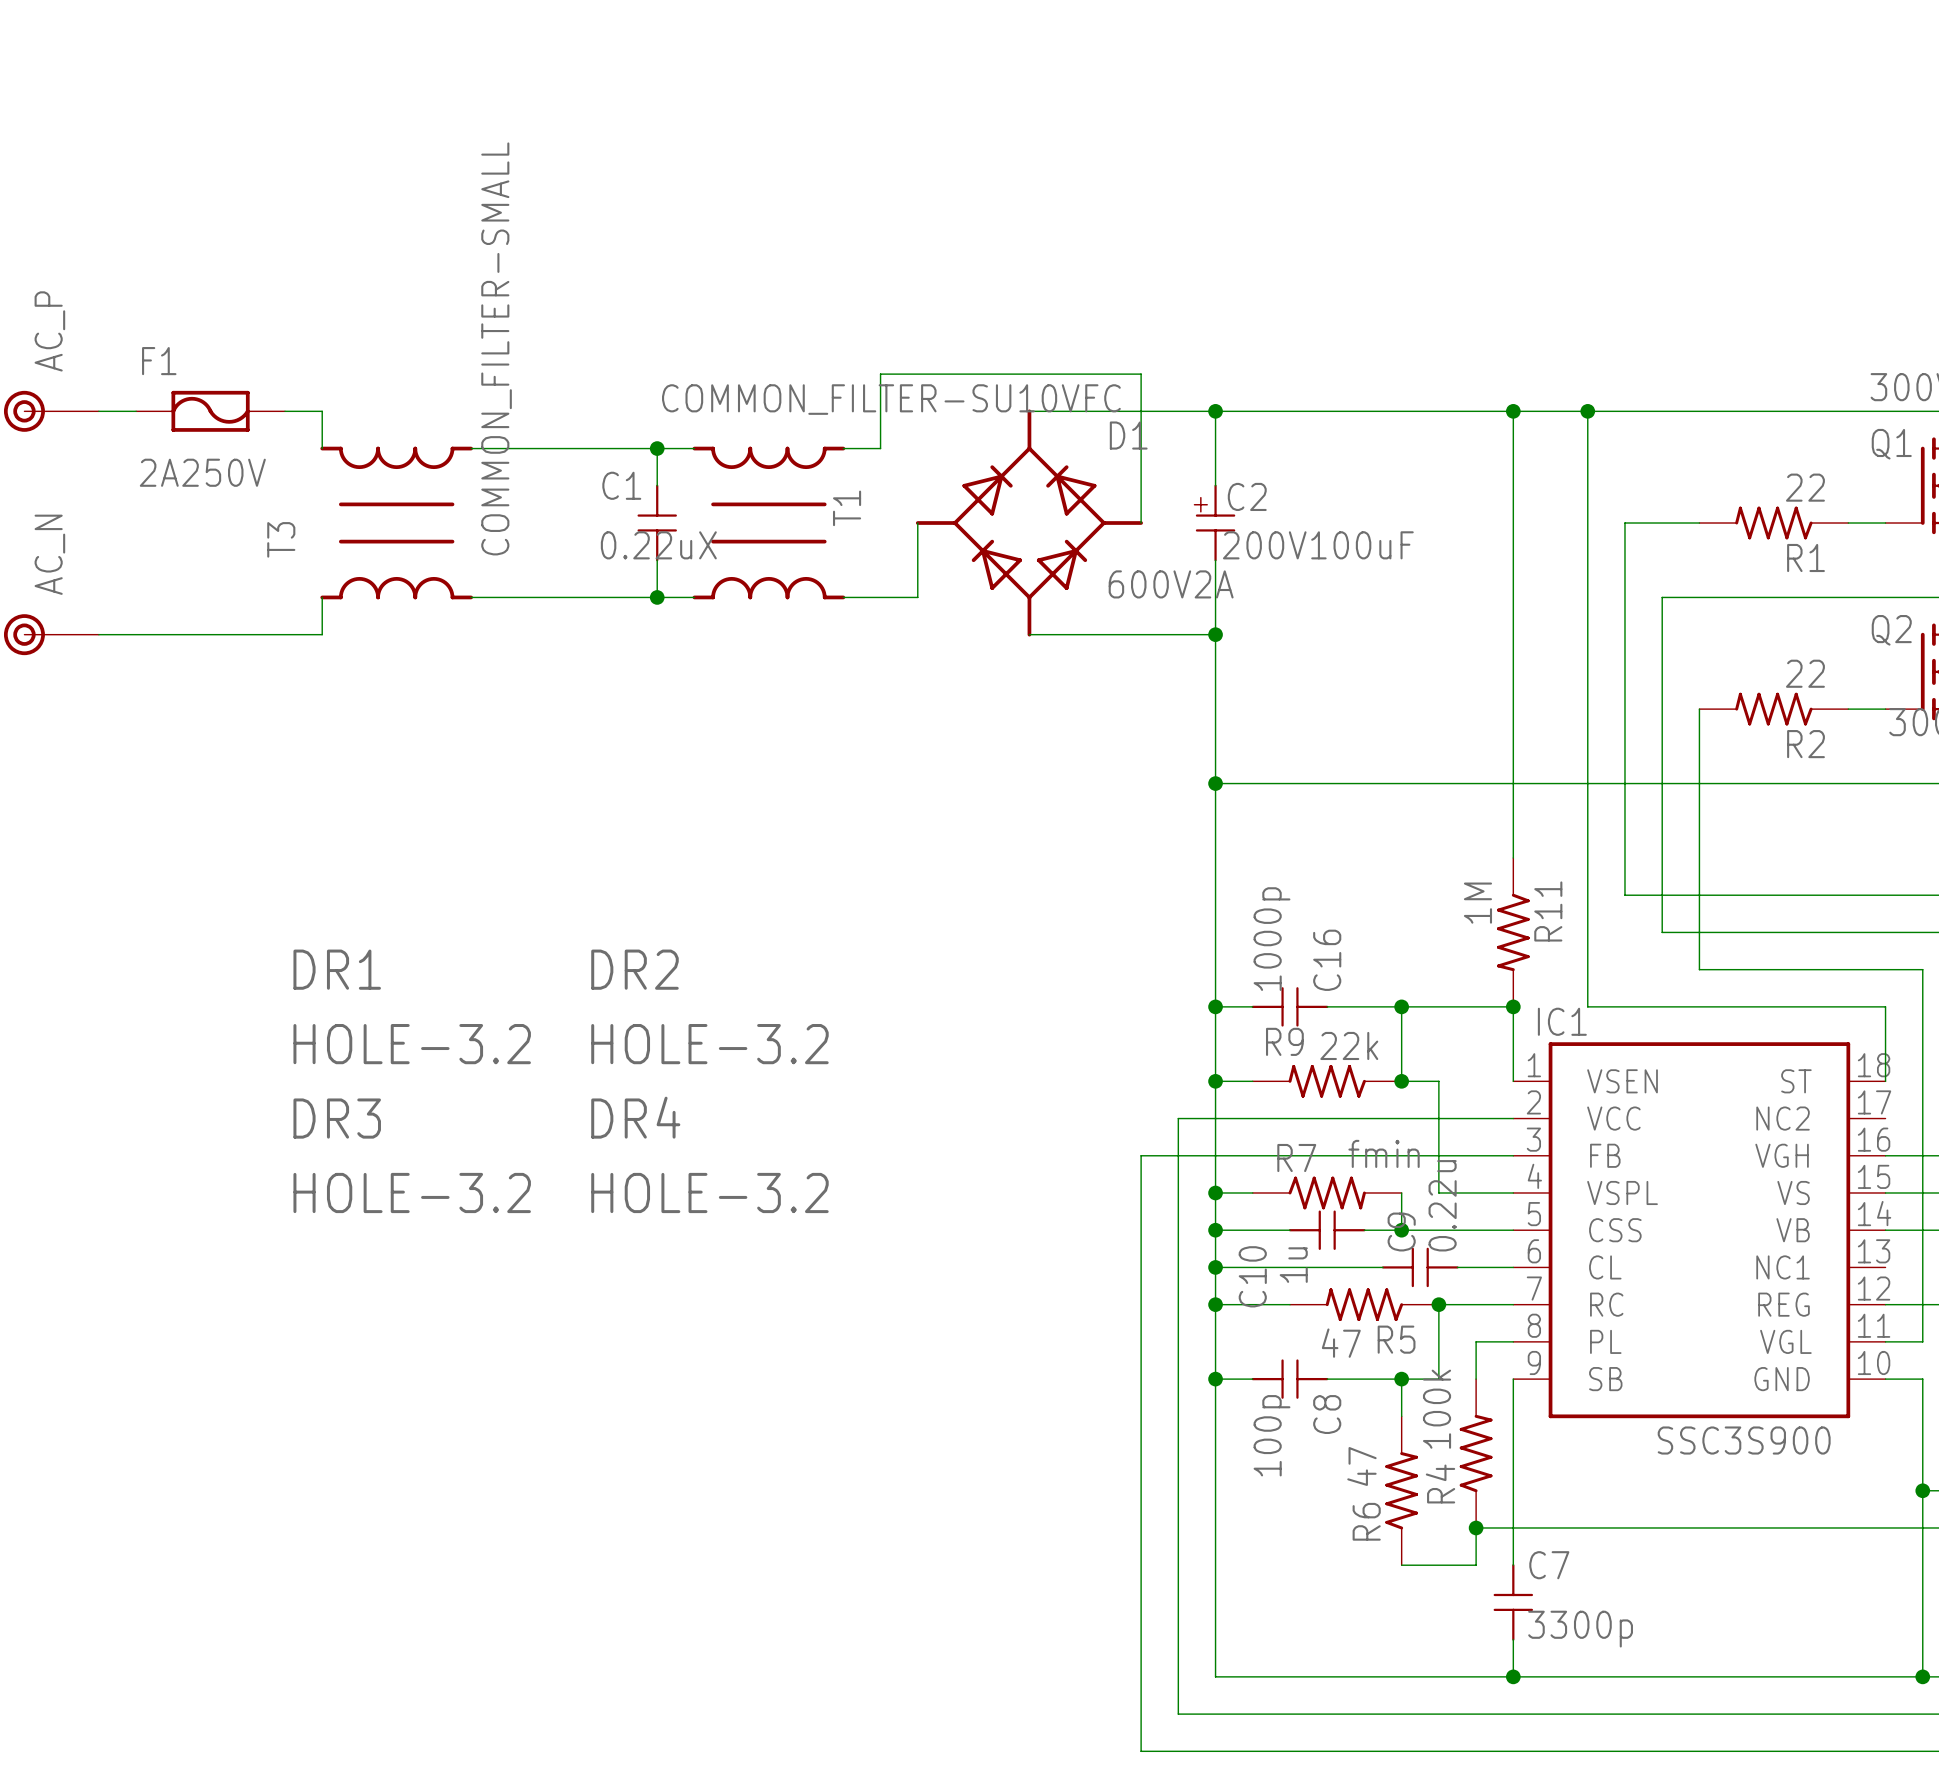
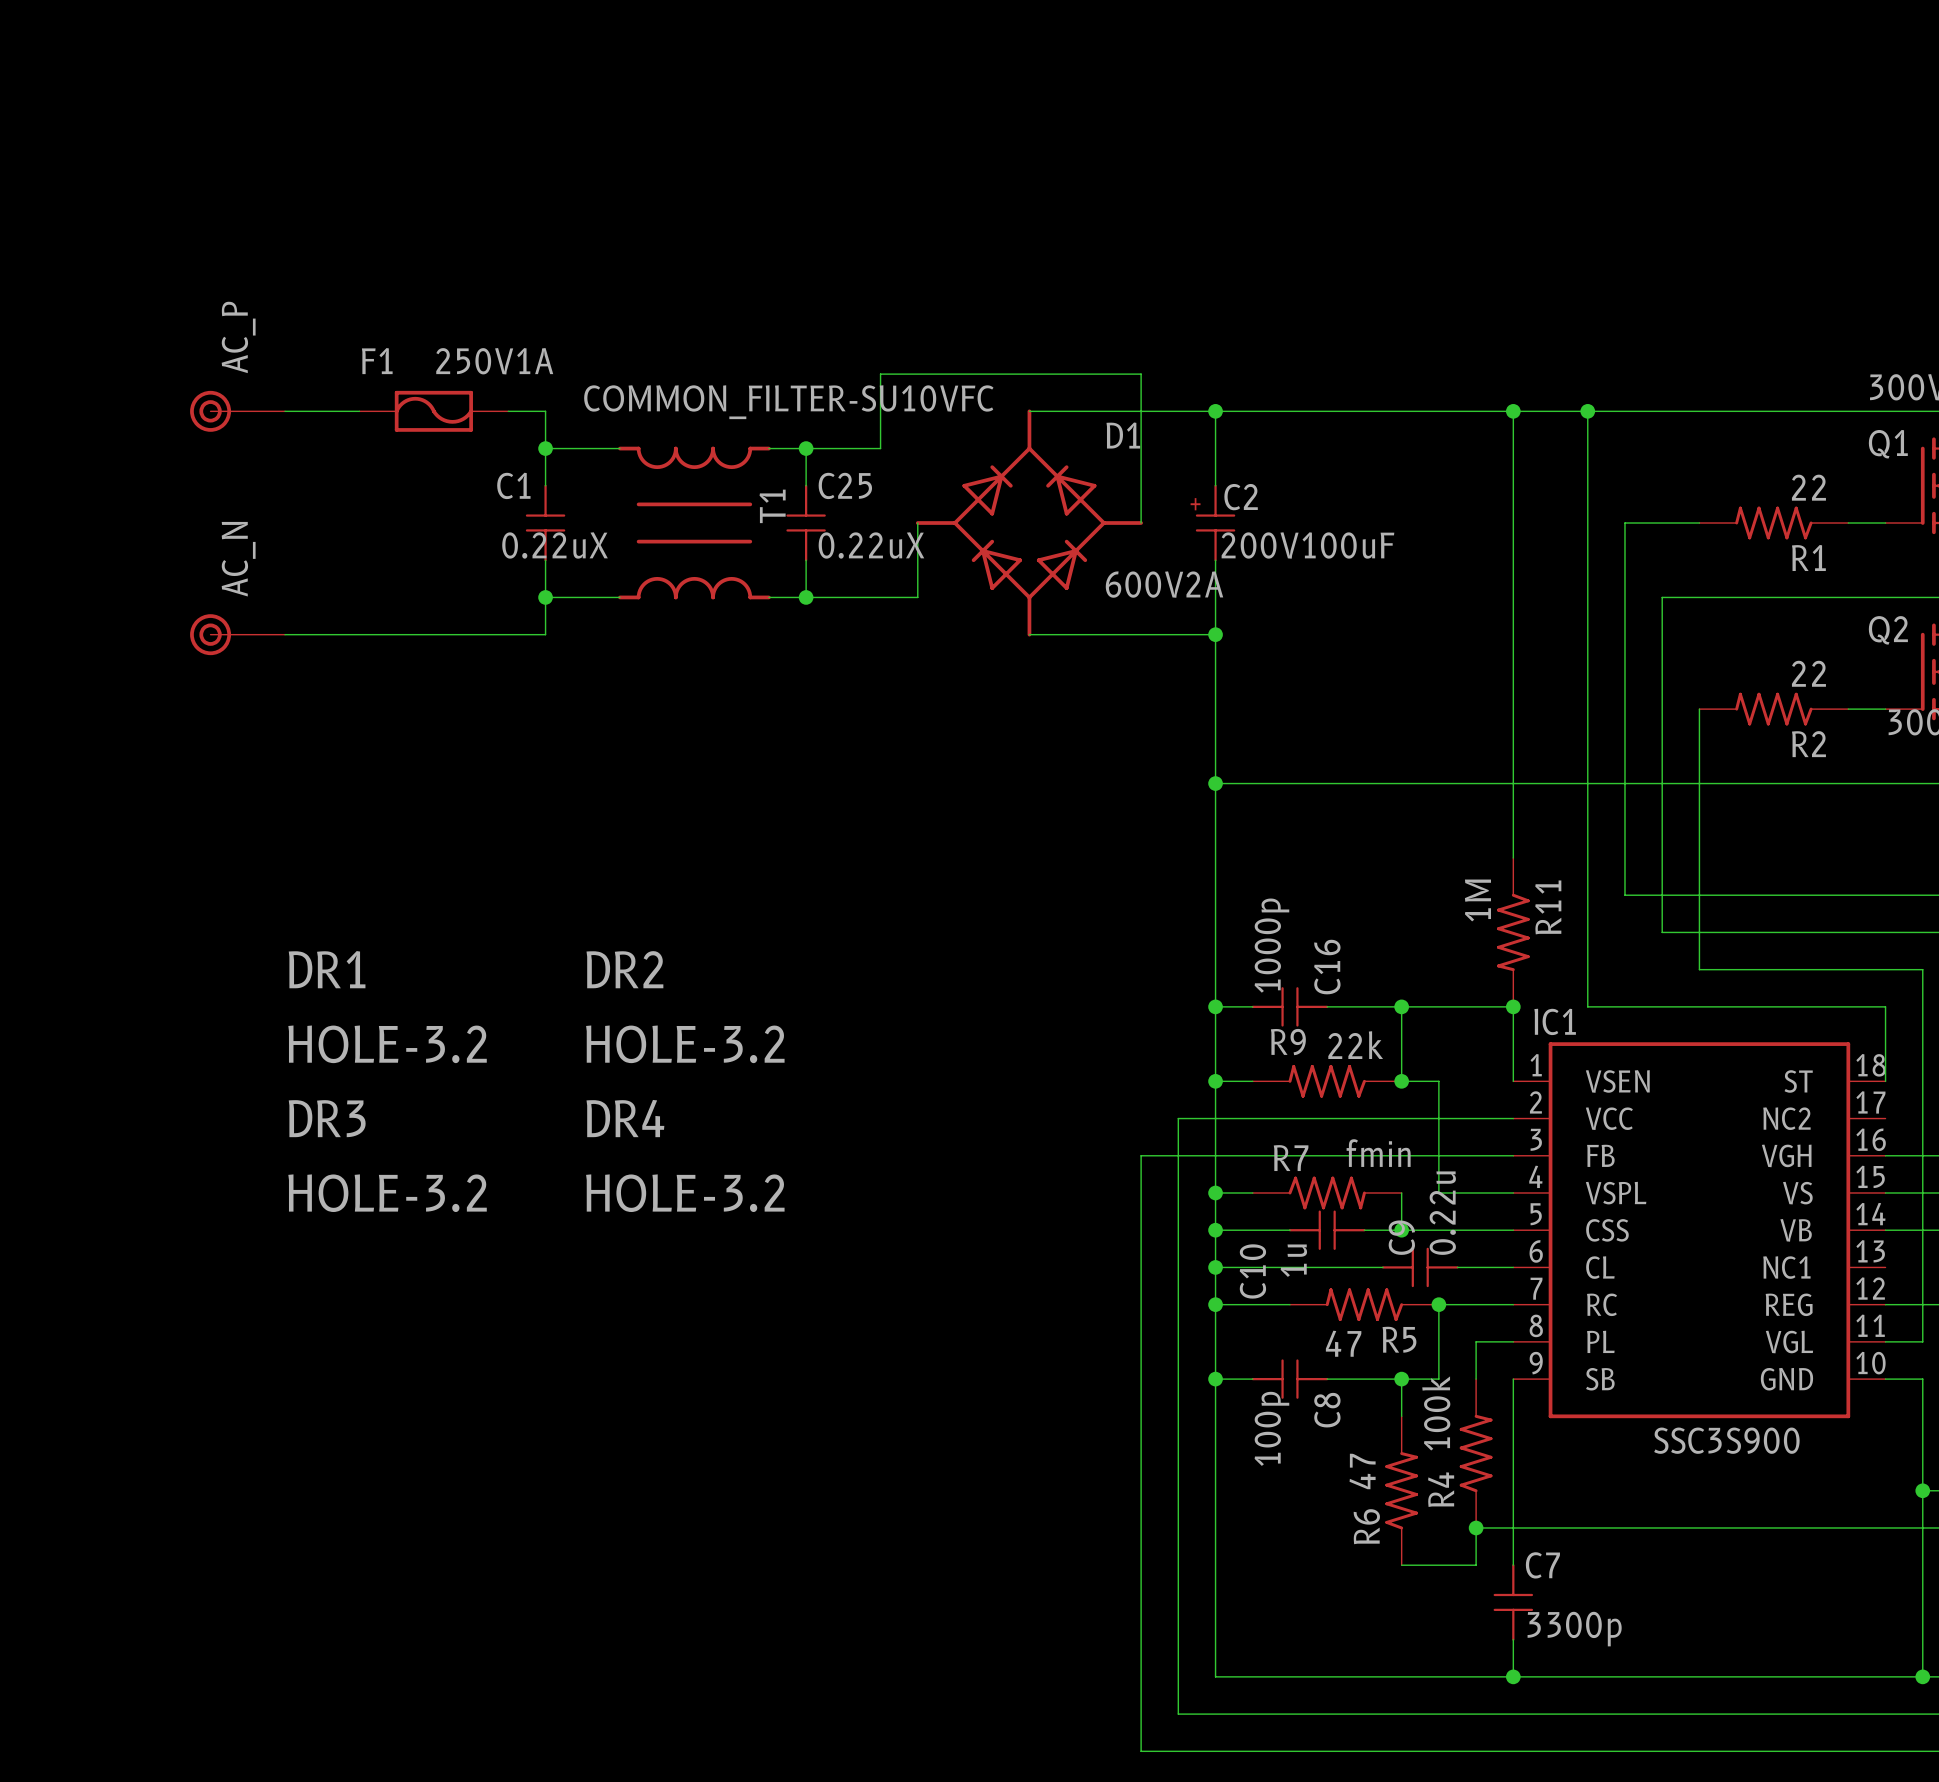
part position: (51, 411) -> (237, 411)
wire: (98, 411) (136, 411) -> none
F1 position: (210, 411) -> (433, 411)
wire: (322, 411) (322, 448) -> (322, 411) (359, 411)
wire: none -> (508, 411) (545, 411) (545, 485)
wire: (471, 448) (545, 448) -> none
junction: none -> (545, 448)
wire: (620, 448) (694, 448) -> (768, 448) (843, 448)
wire: (657, 448) (657, 485) -> (806, 448) (806, 485)
junction: (657, 448) -> none
junction: none -> (806, 448)
F1 value: 2A250V (202, 472) -> 250V1A (494, 361)
T3: COMMON_FILTER-SMALL (396, 523) -> none
C1 position: (657, 523) -> (545, 523)
T1 position: (768, 523) -> (694, 523)
C25: none -> 0.22uX (806, 523)
wire: (657, 560) (657, 597) -> (806, 560) (806, 597)
wire: (322, 597) (322, 634) -> (545, 560) (545, 634) (322, 634)
wire: (471, 597) (545, 597) -> none
junction: none -> (545, 597)
wire: (620, 597) (694, 597) -> (768, 597) (843, 597)
junction: (657, 597) -> none
junction: none -> (806, 597)
part position: (51, 634) -> (237, 634)
wire: (98, 634) (285, 634) -> none

